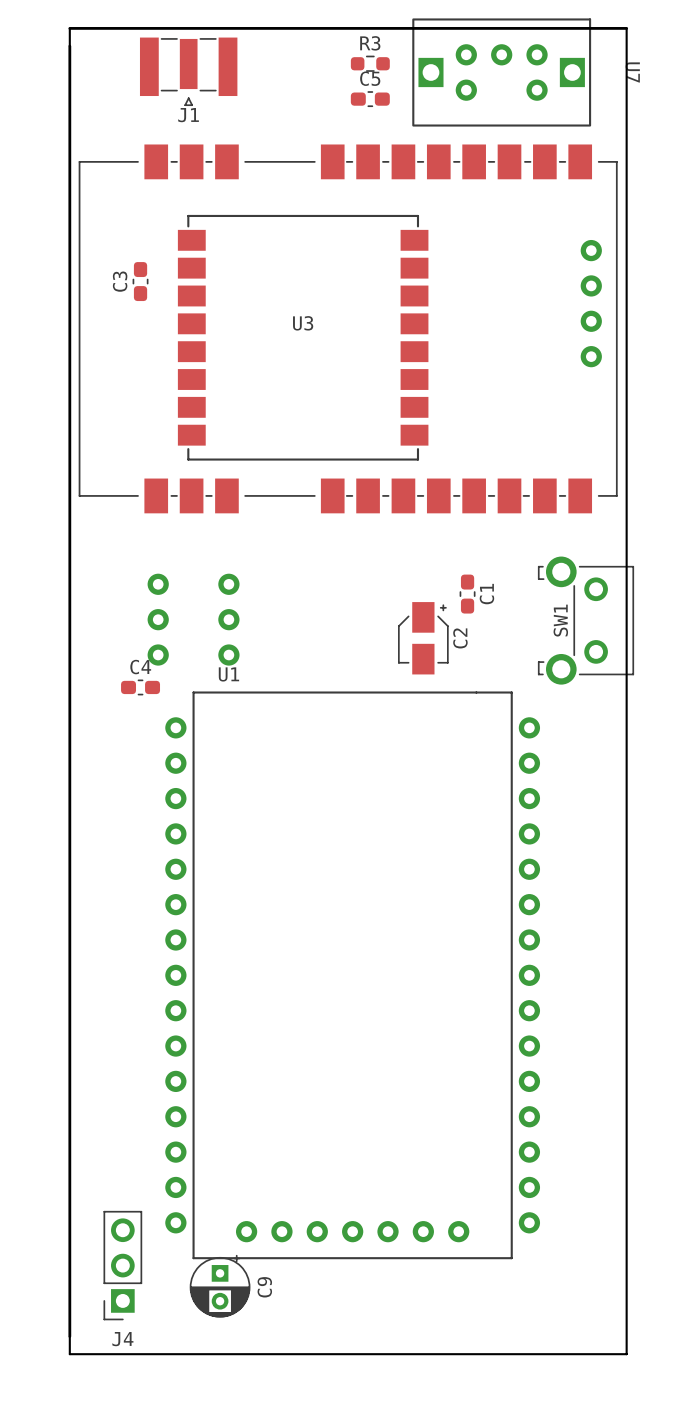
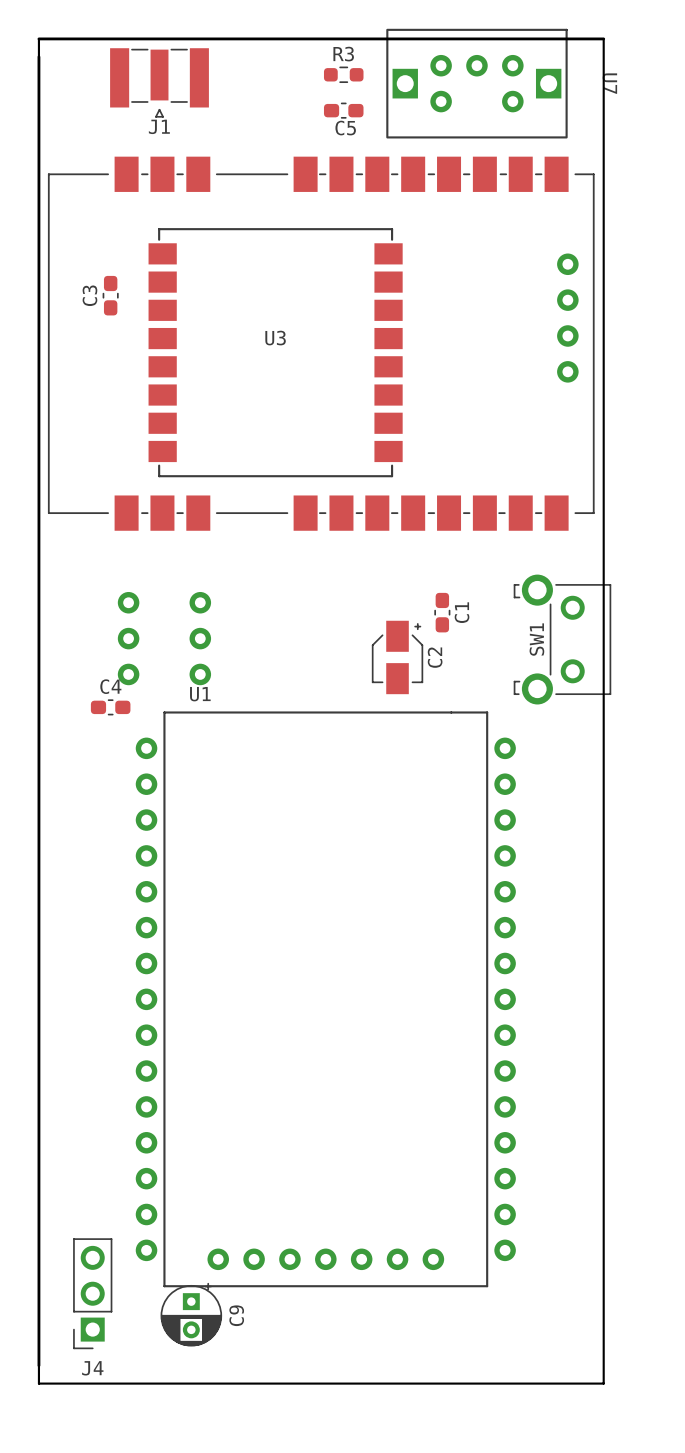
C5 name position: C5 (370, 78) -> C5 (345, 128)

